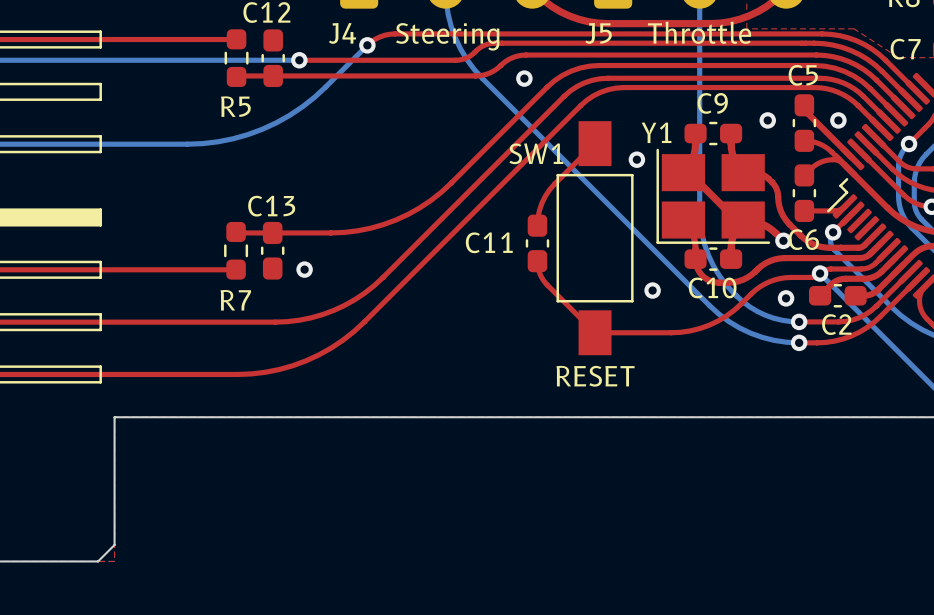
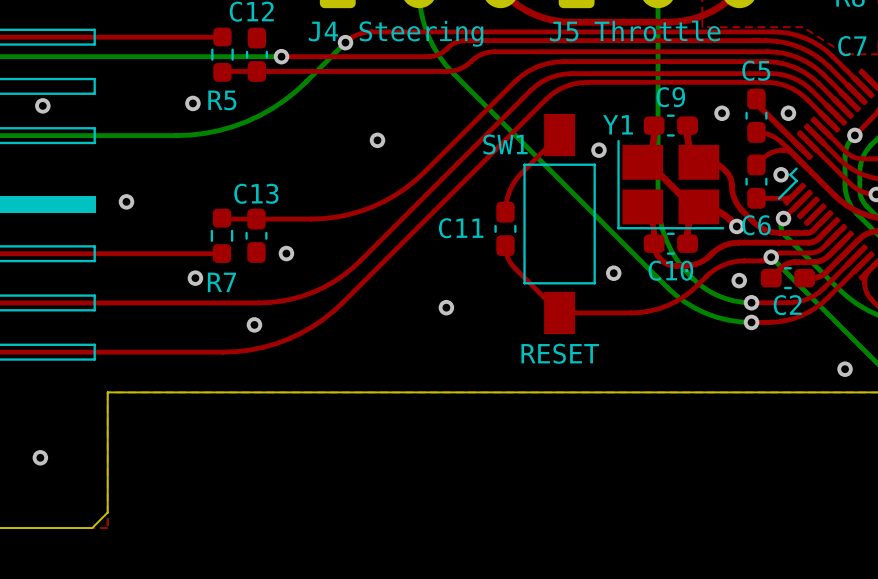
via: (524, 78) -> none
via: none -> (192, 103)
via: none -> (42, 105)
via: none -> (377, 140)
via: none -> (781, 174)
via: none -> (126, 201)
via: none -> (195, 278)
via: none -> (446, 307)
via: none -> (254, 324)
via: none -> (845, 369)
via: none -> (40, 457)

